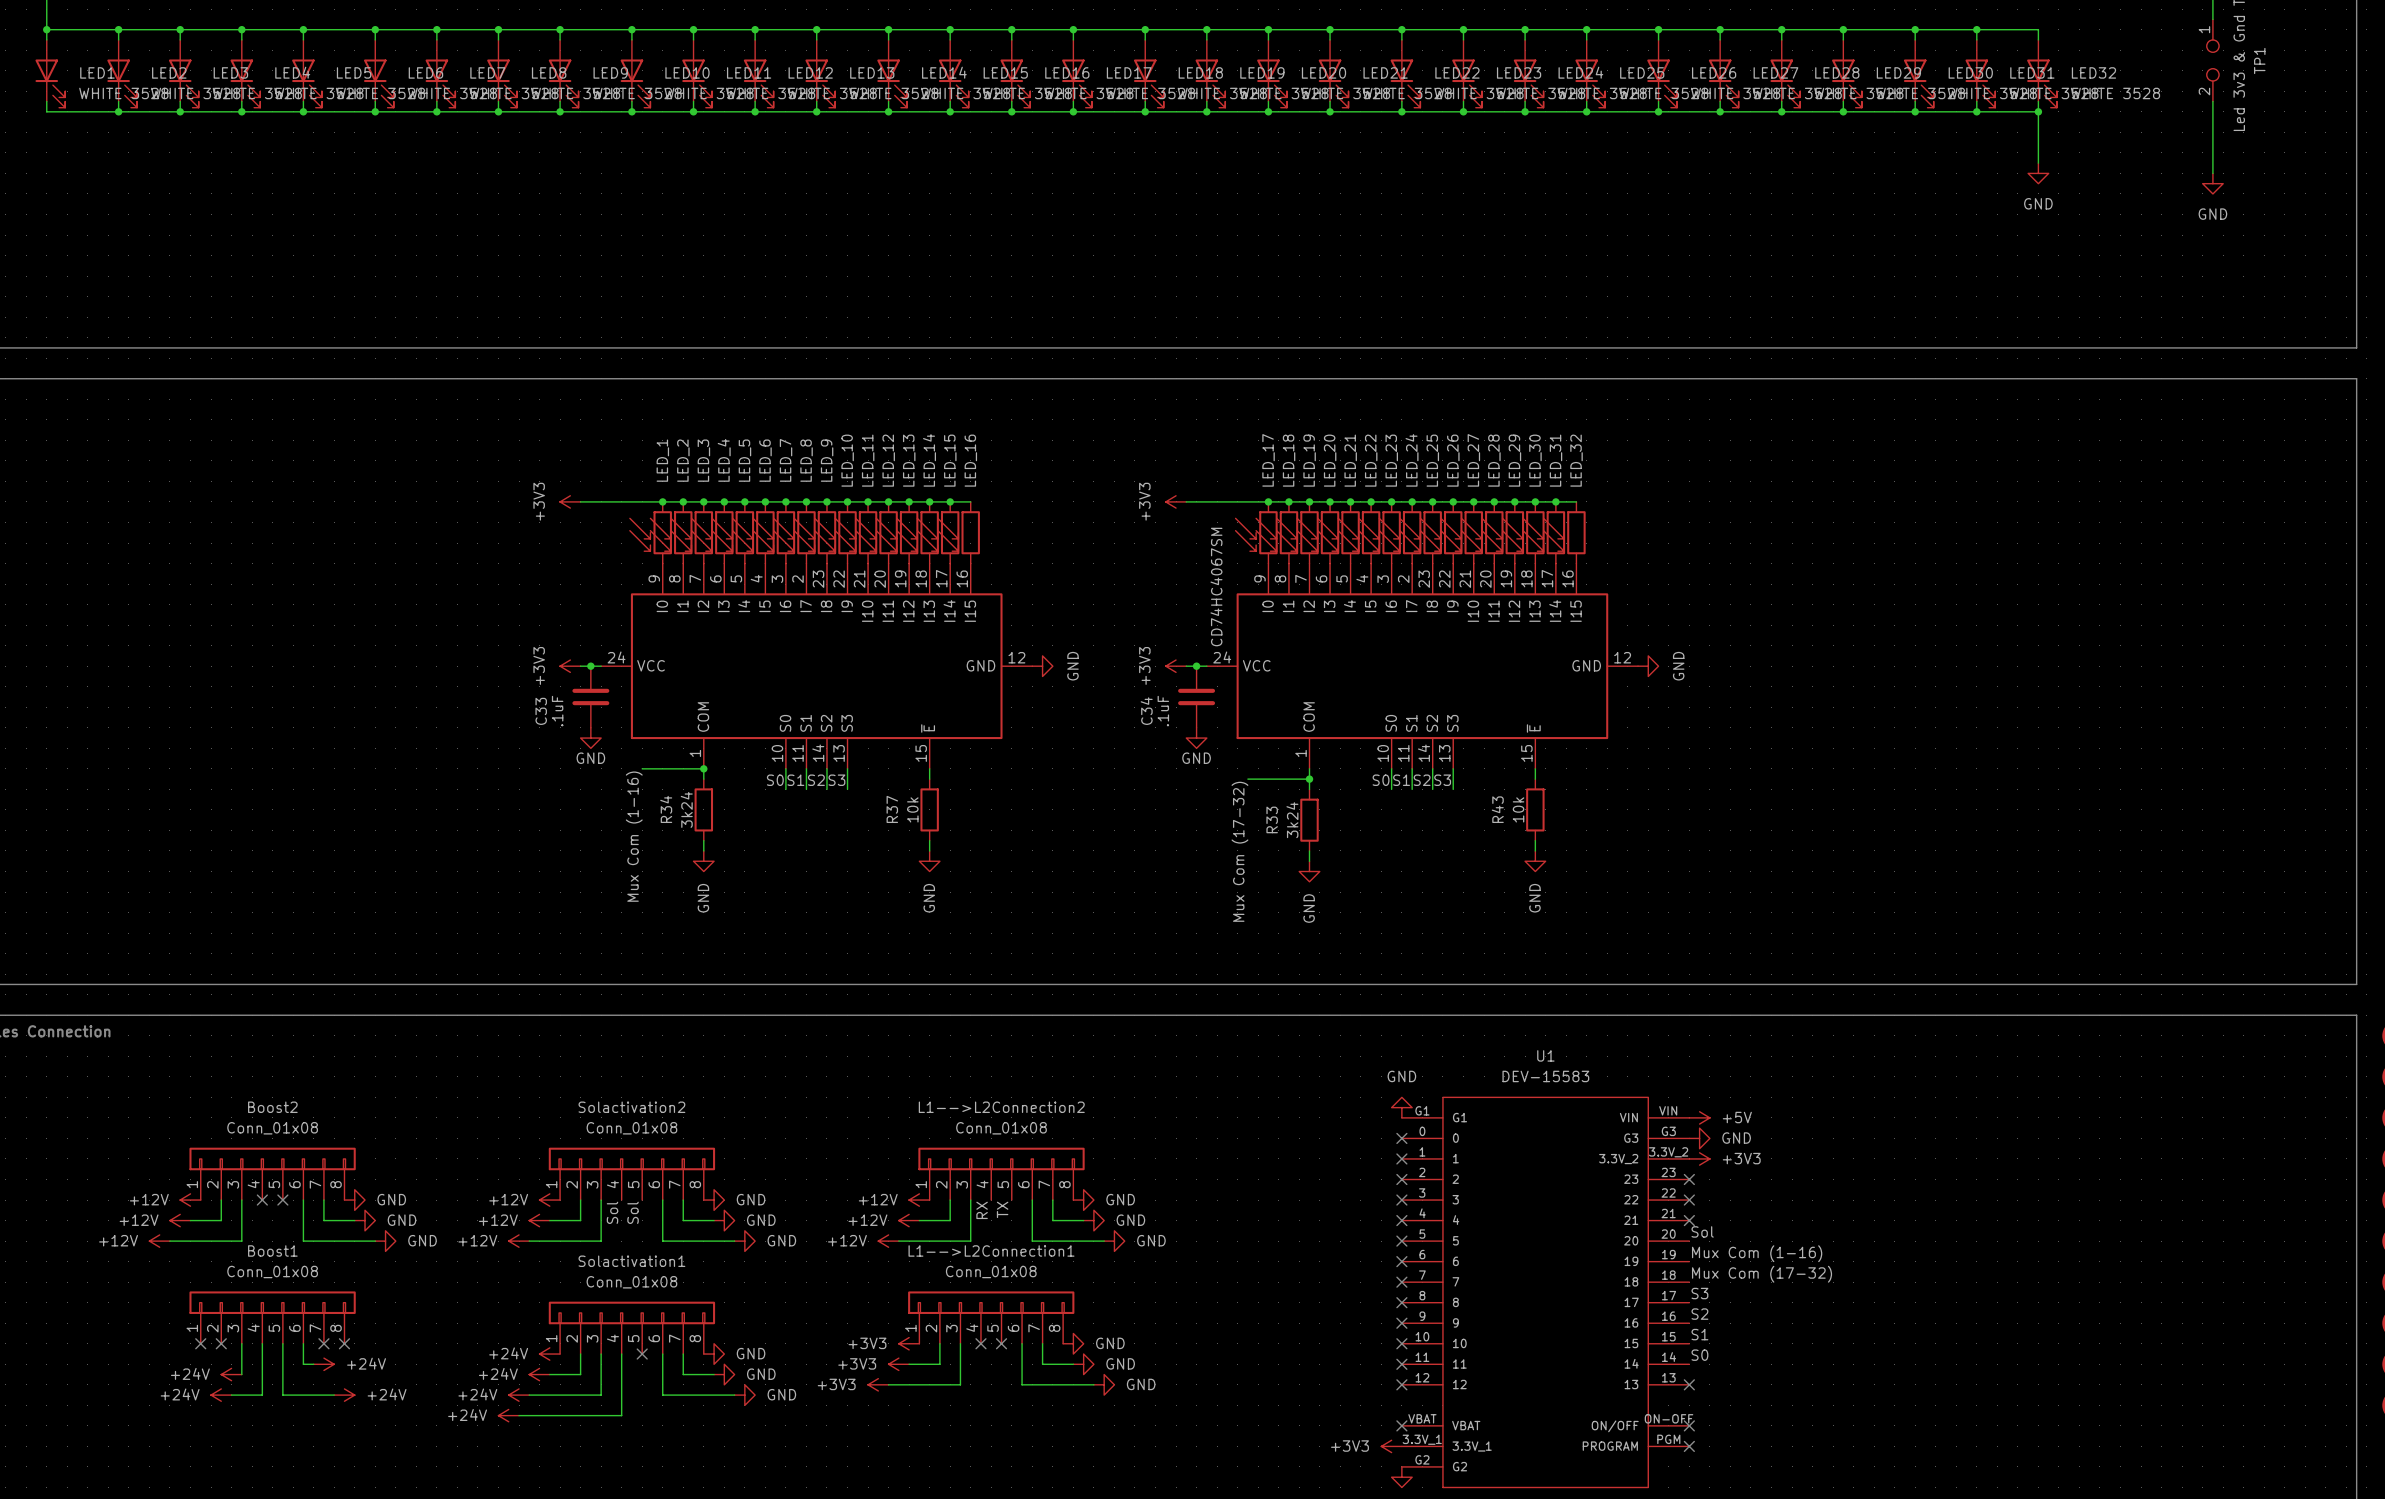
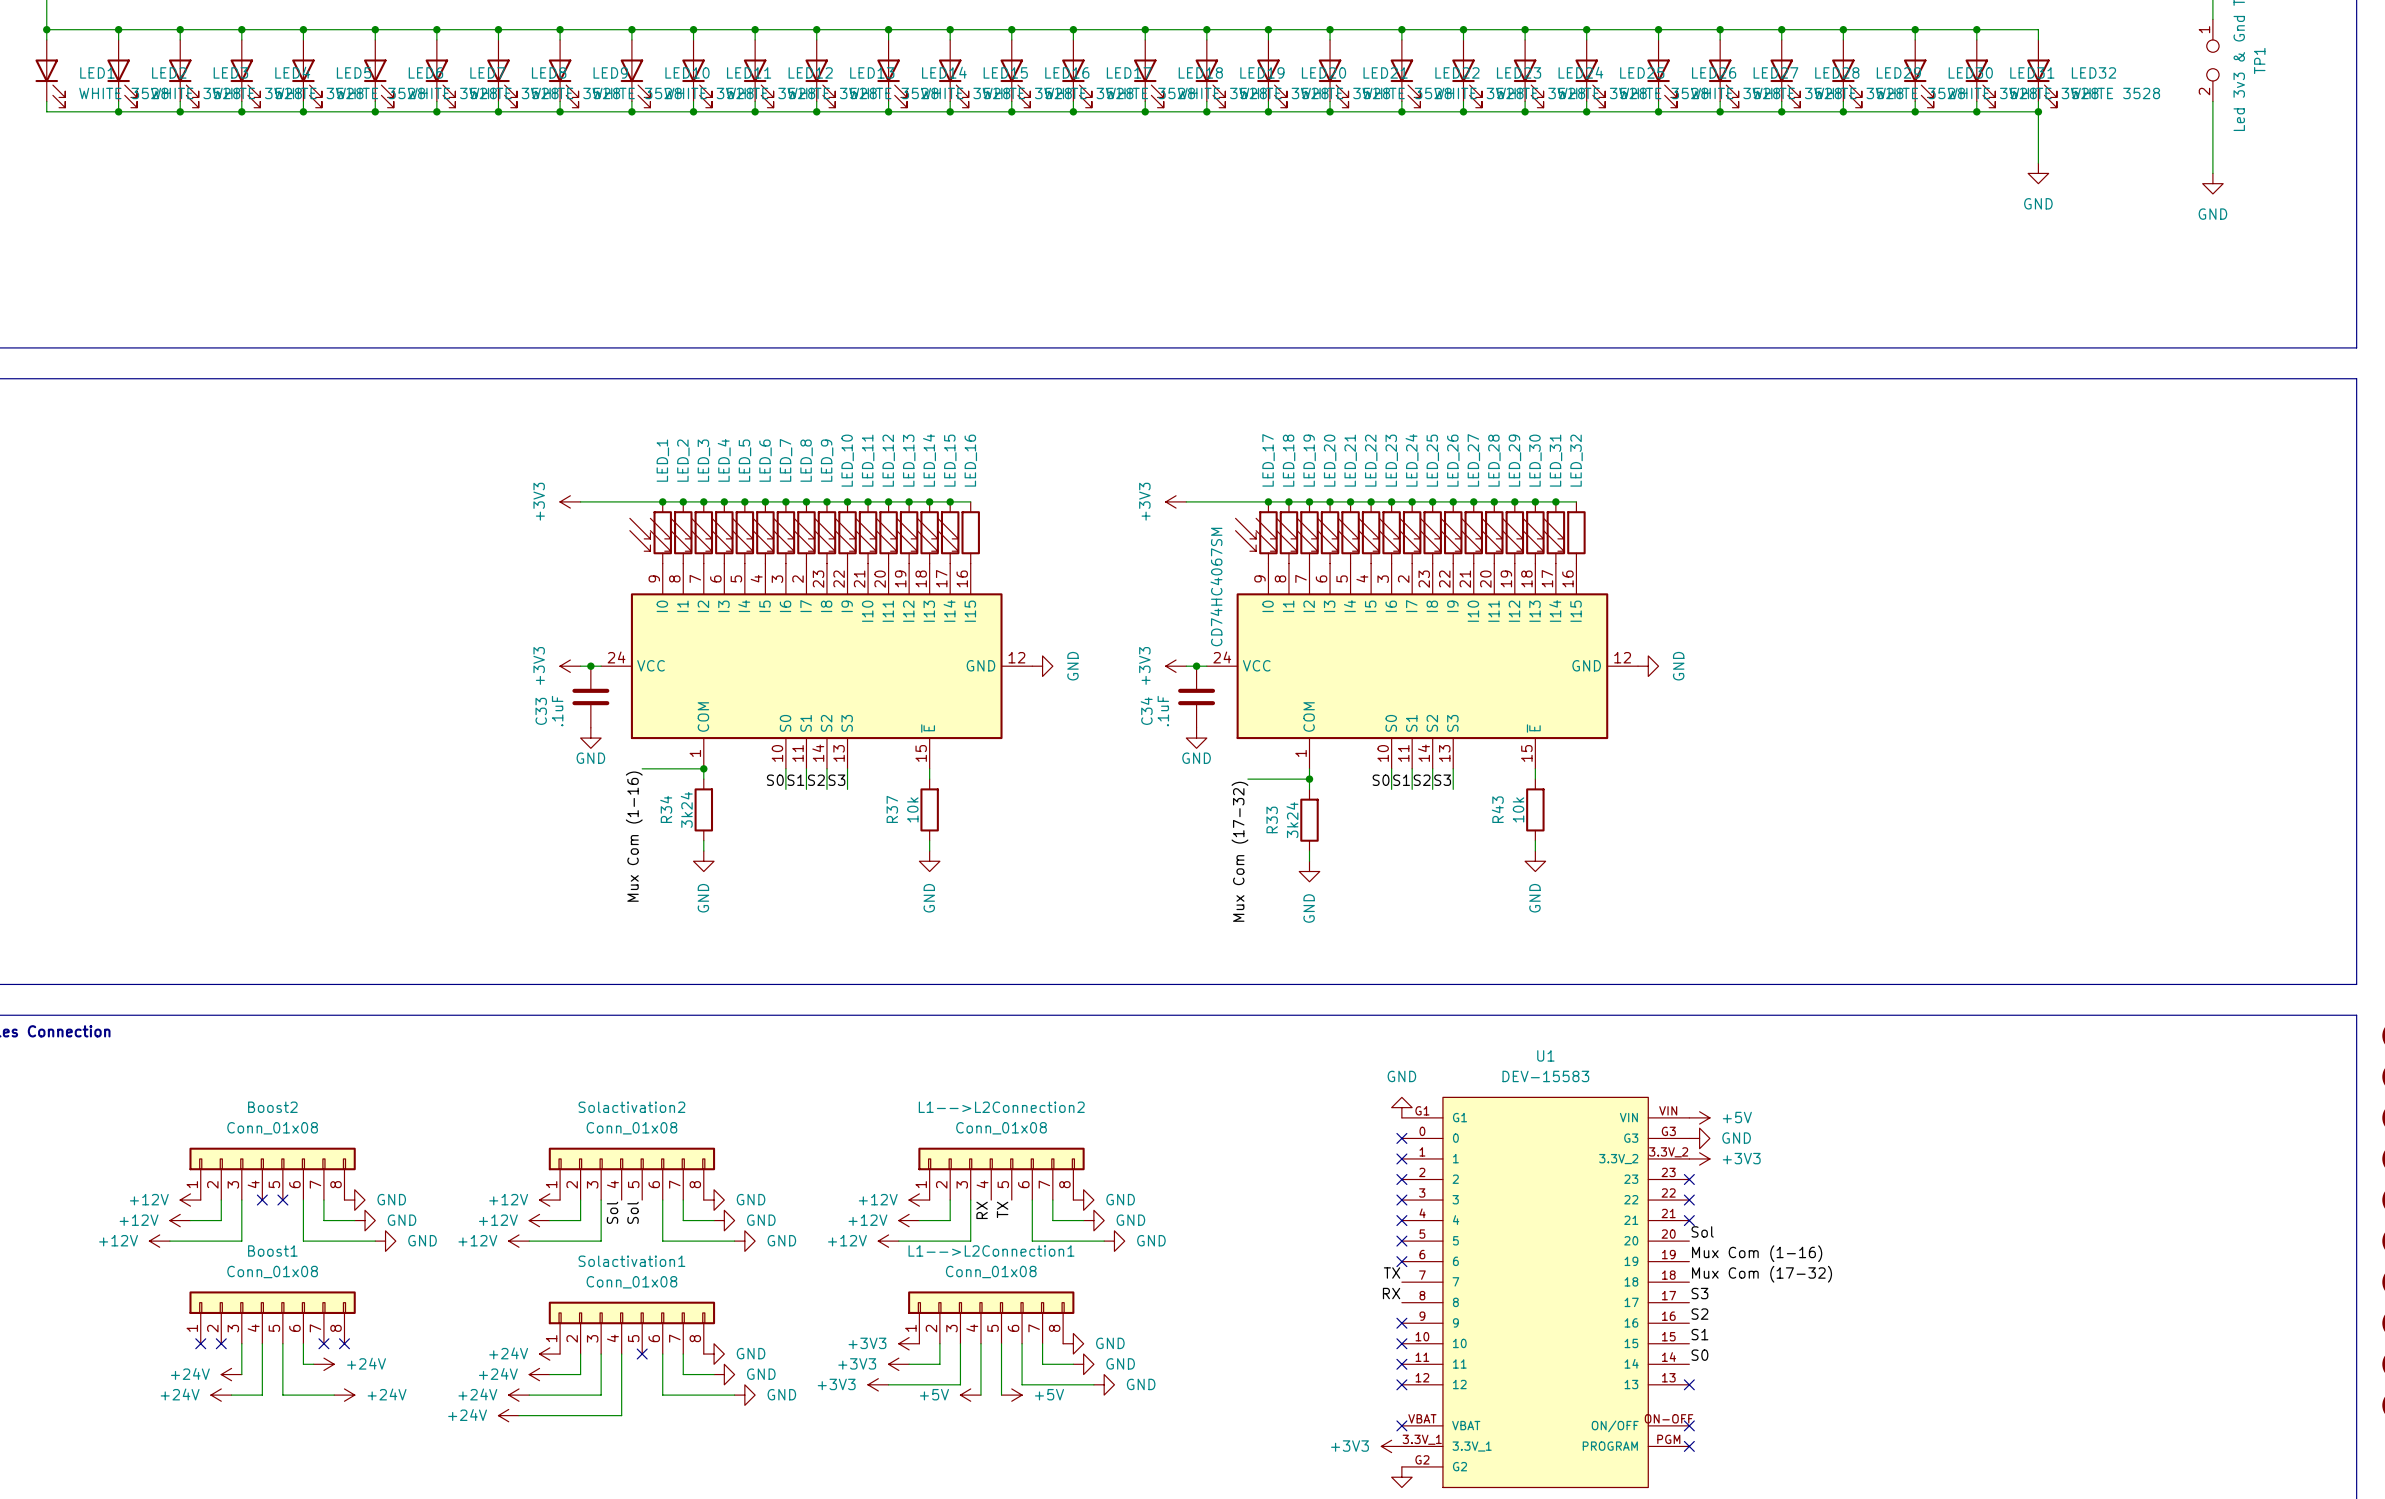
label: none -> TX (1392, 1273)
no-connect mark: (1401, 1282) -> none
label: none -> RX (1391, 1293)
no-connect mark: (1401, 1302) -> none
wire: none -> (980, 1343) (980, 1395)
no-connect mark: (980, 1343) -> none
wire: none -> (1001, 1343) (1001, 1395)
no-connect mark: (1001, 1343) -> none
power symbol: none -> +5V (970, 1395)
power symbol: none -> +5V (1011, 1395)

